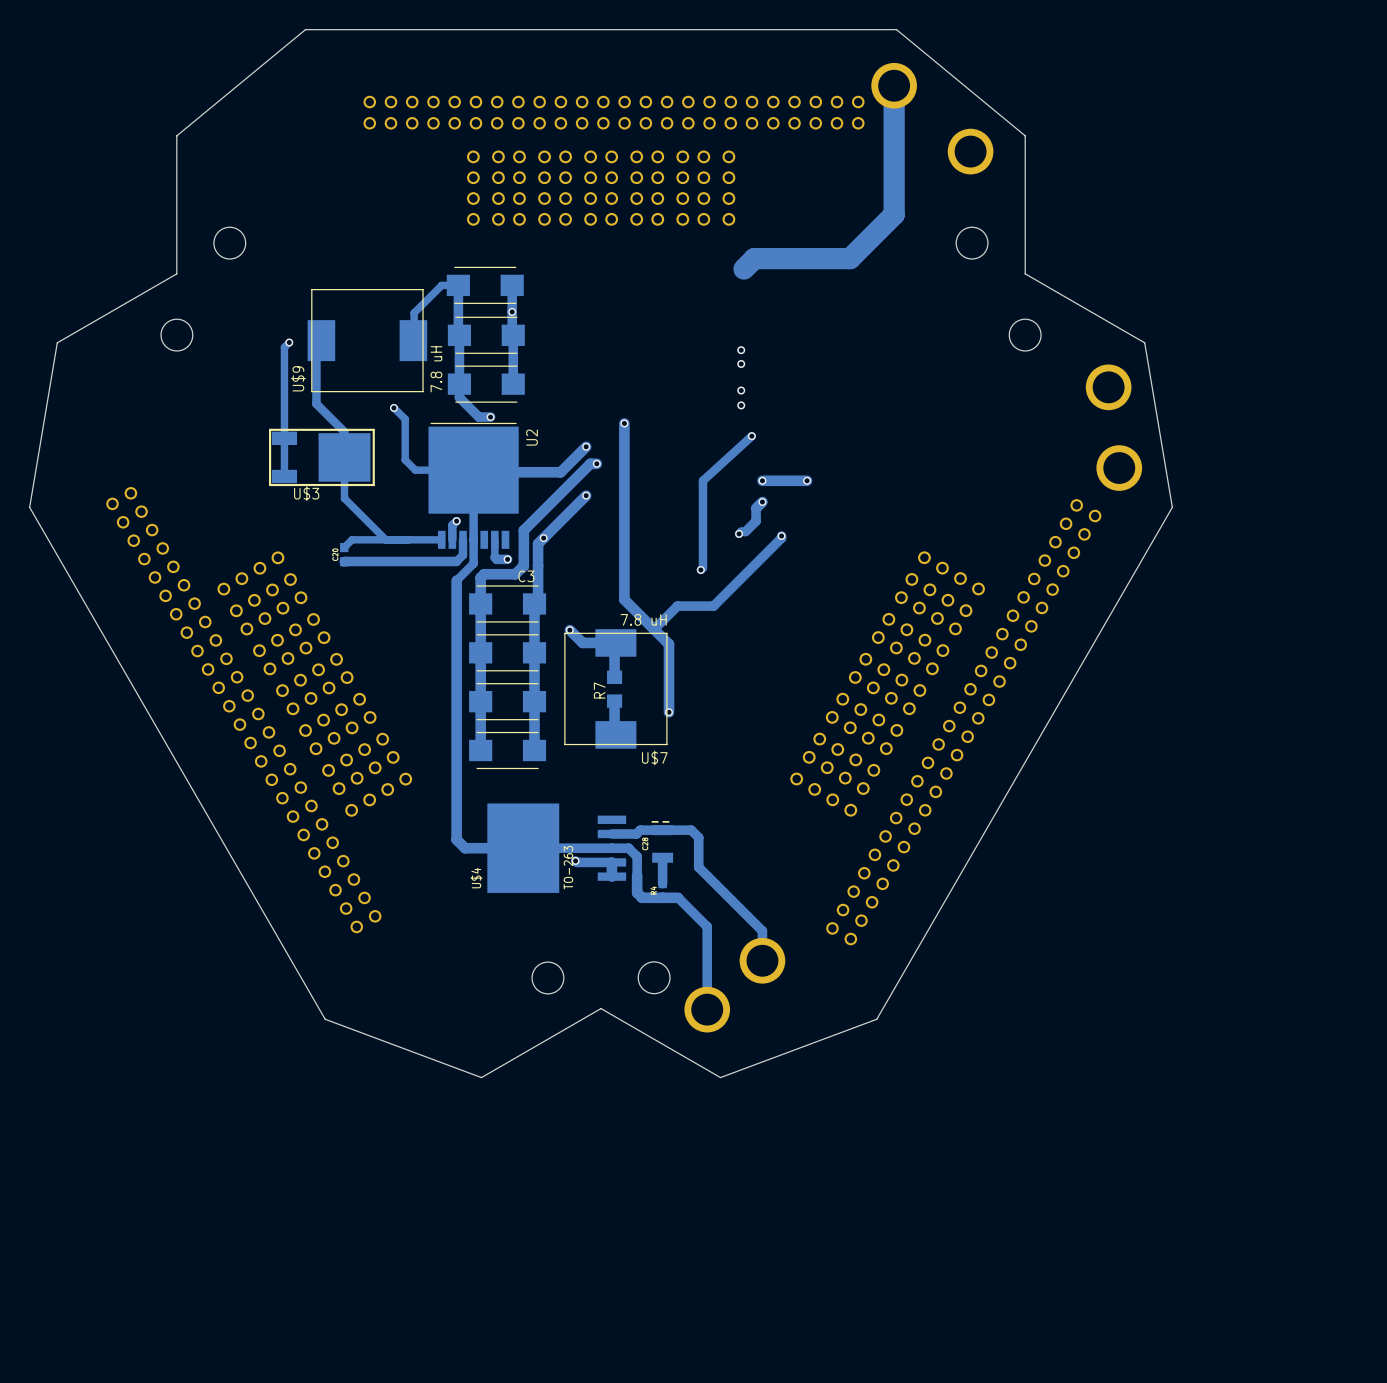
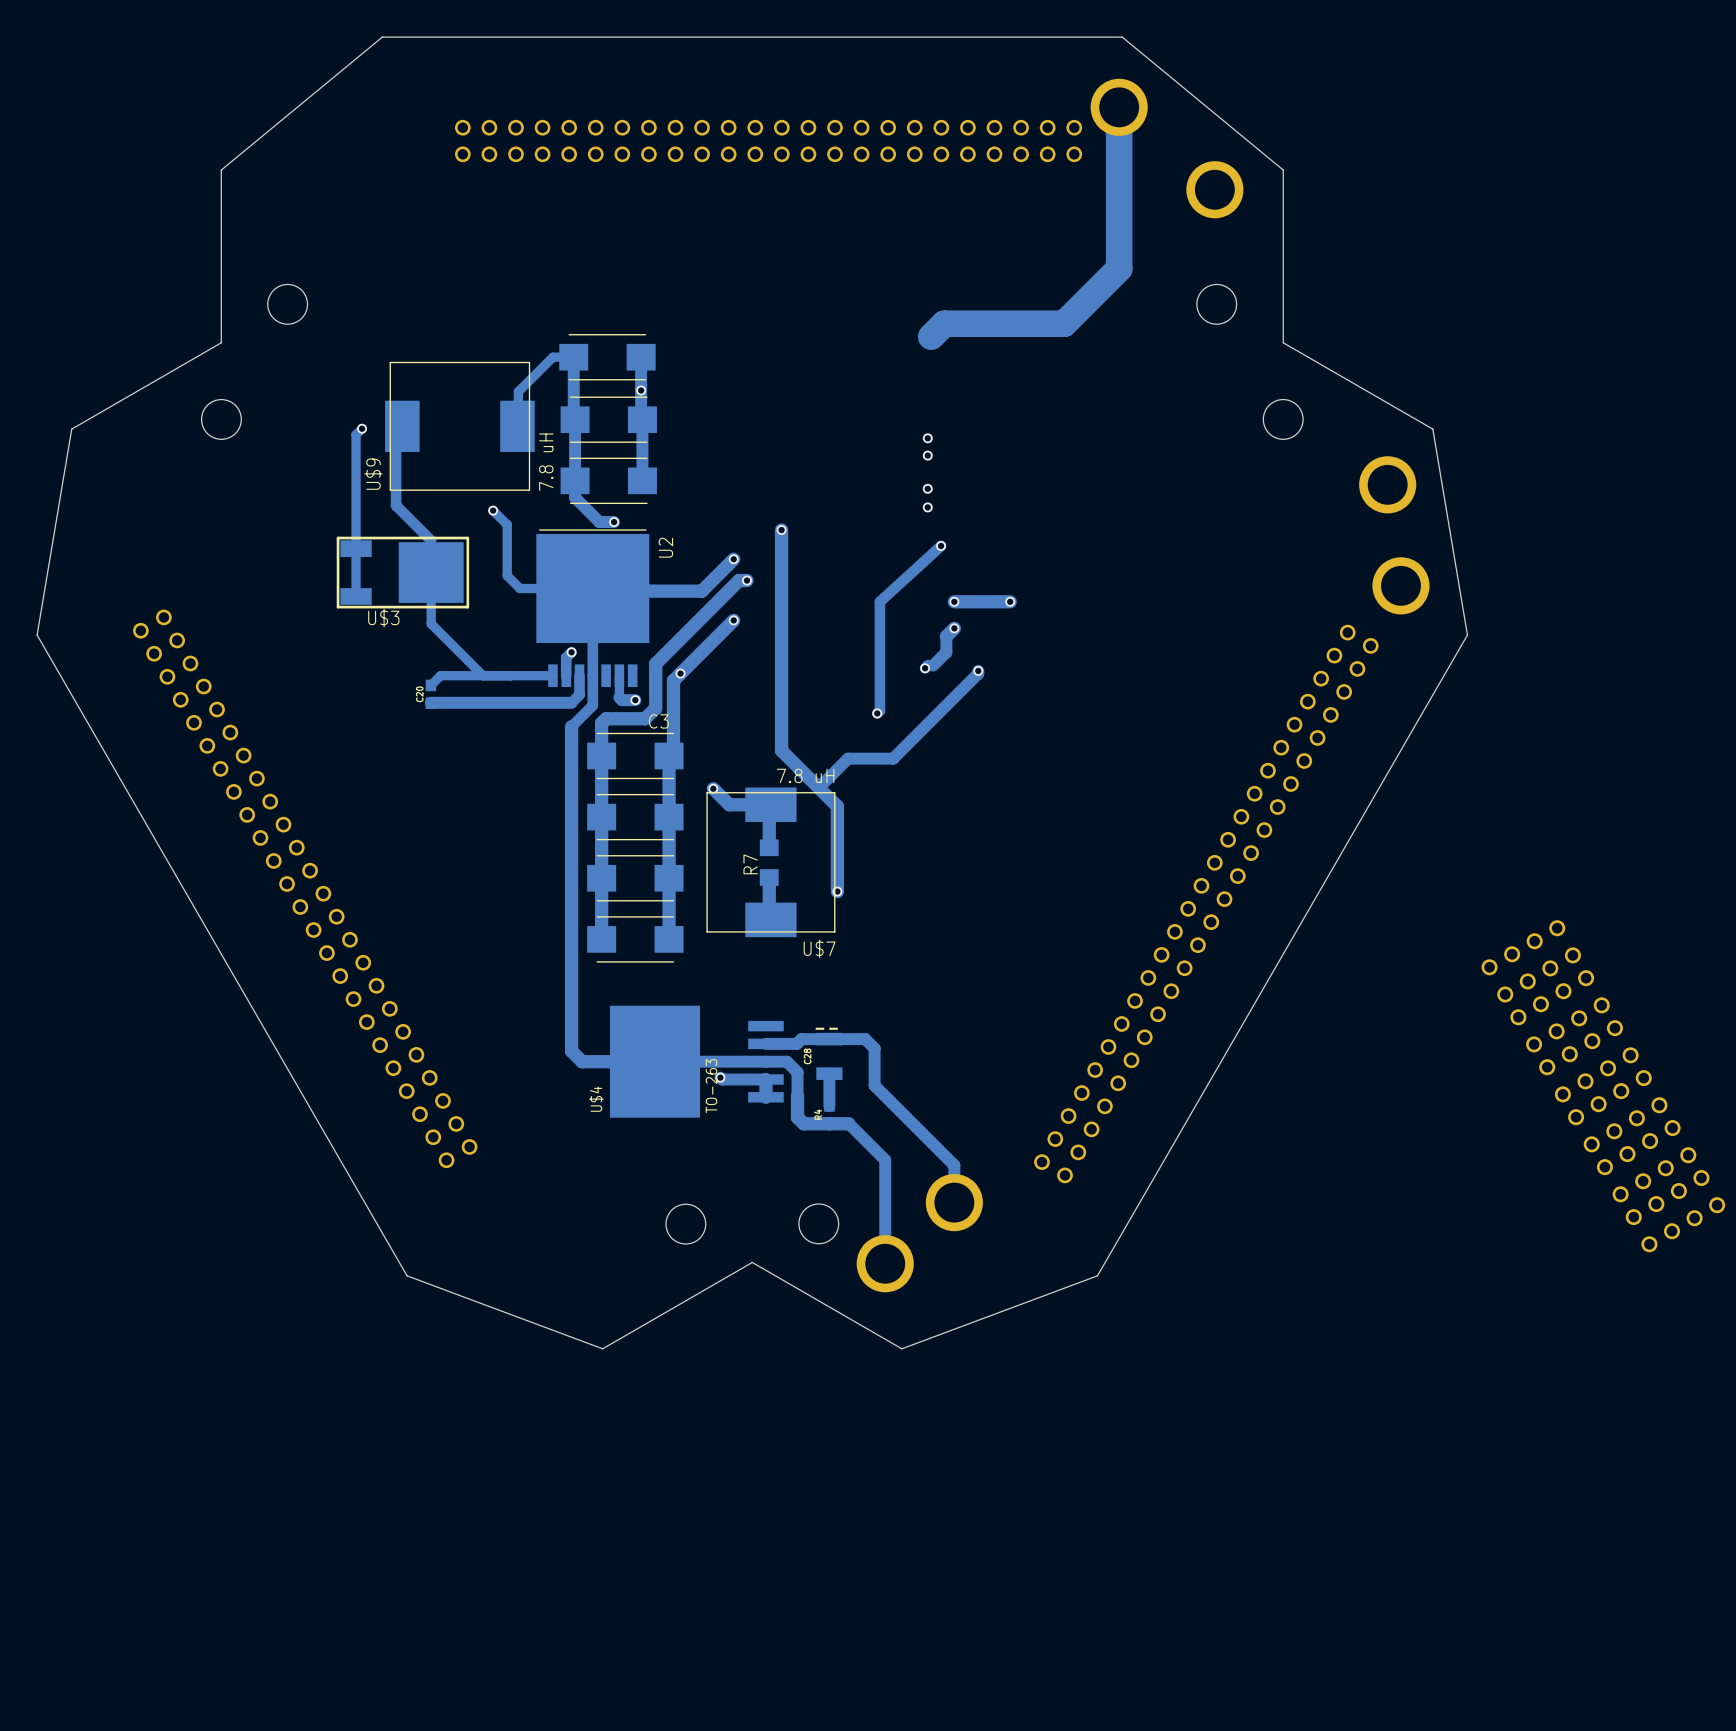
part: (601, 188) -> none
part: (887, 683) -> none
part: (314, 684) -> none
part: none -> (1603, 1086)

